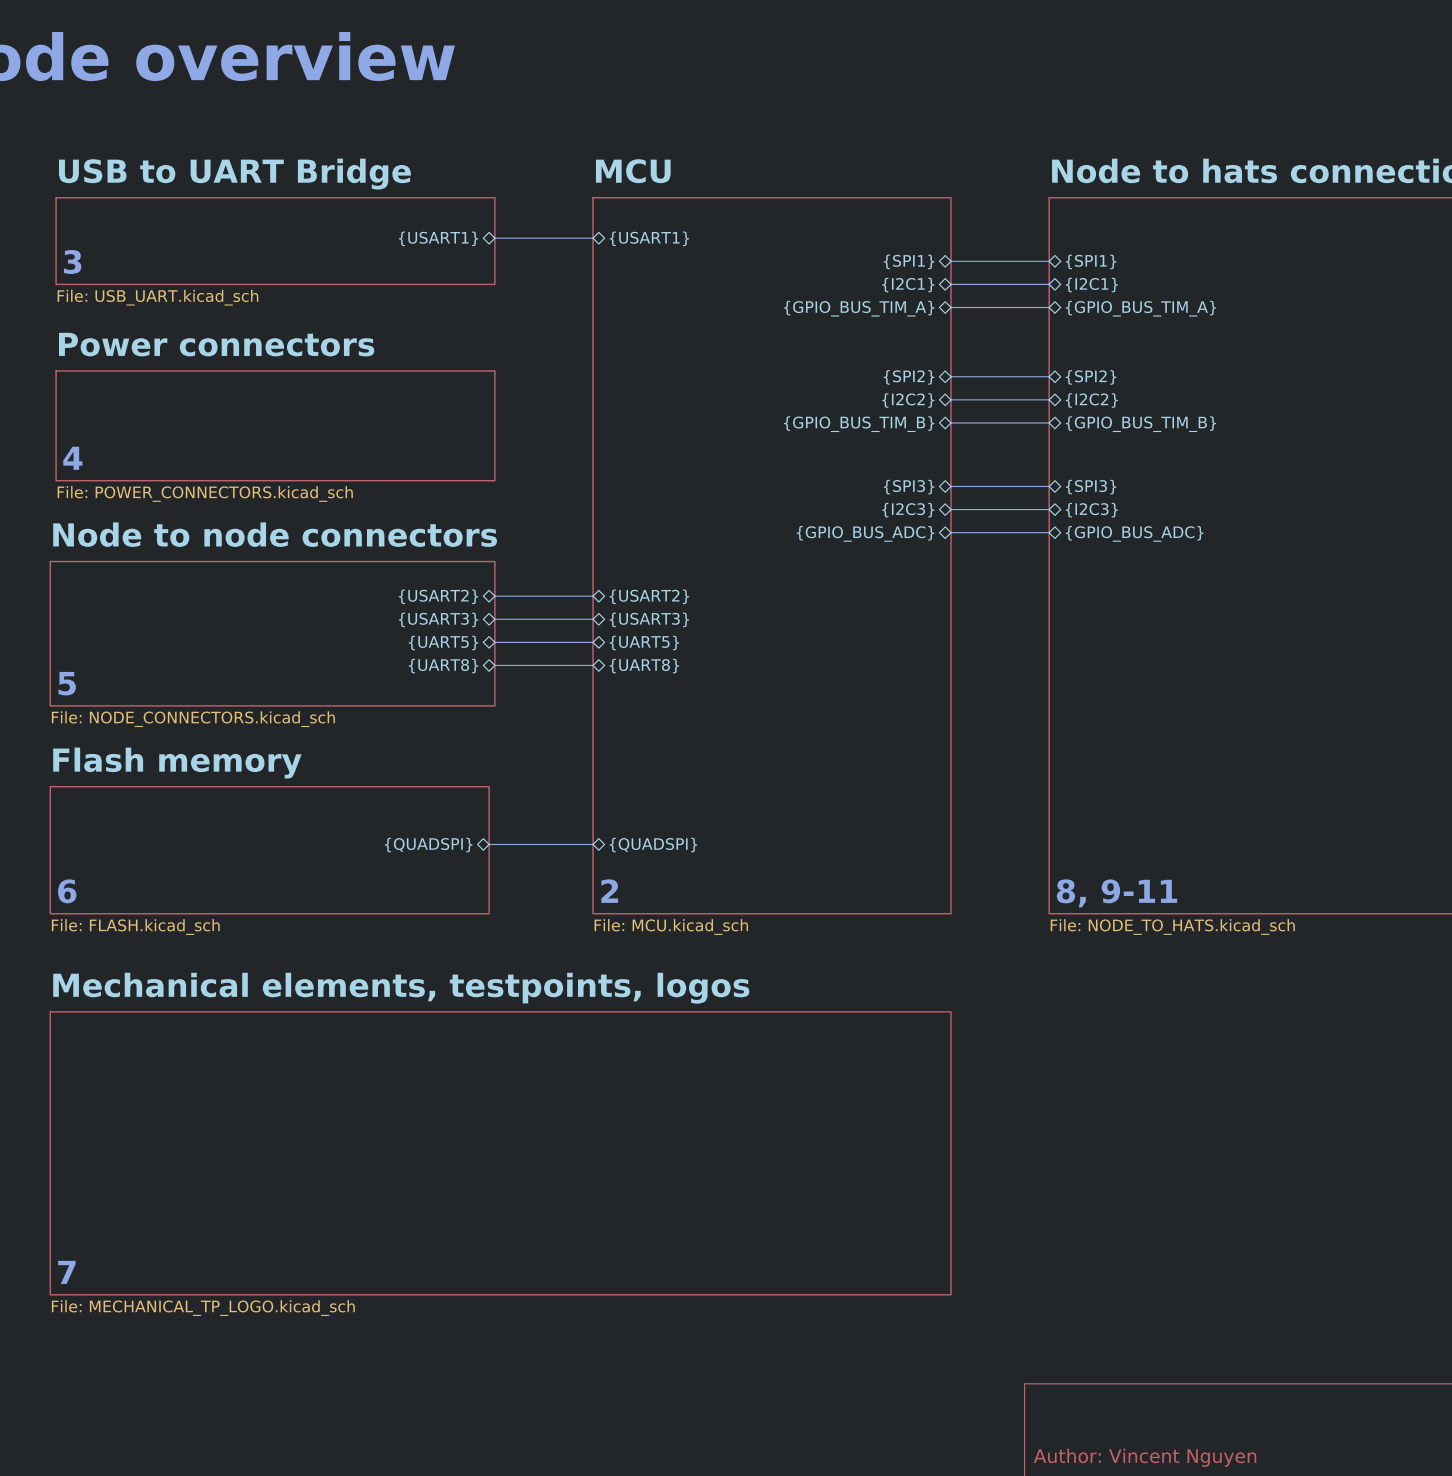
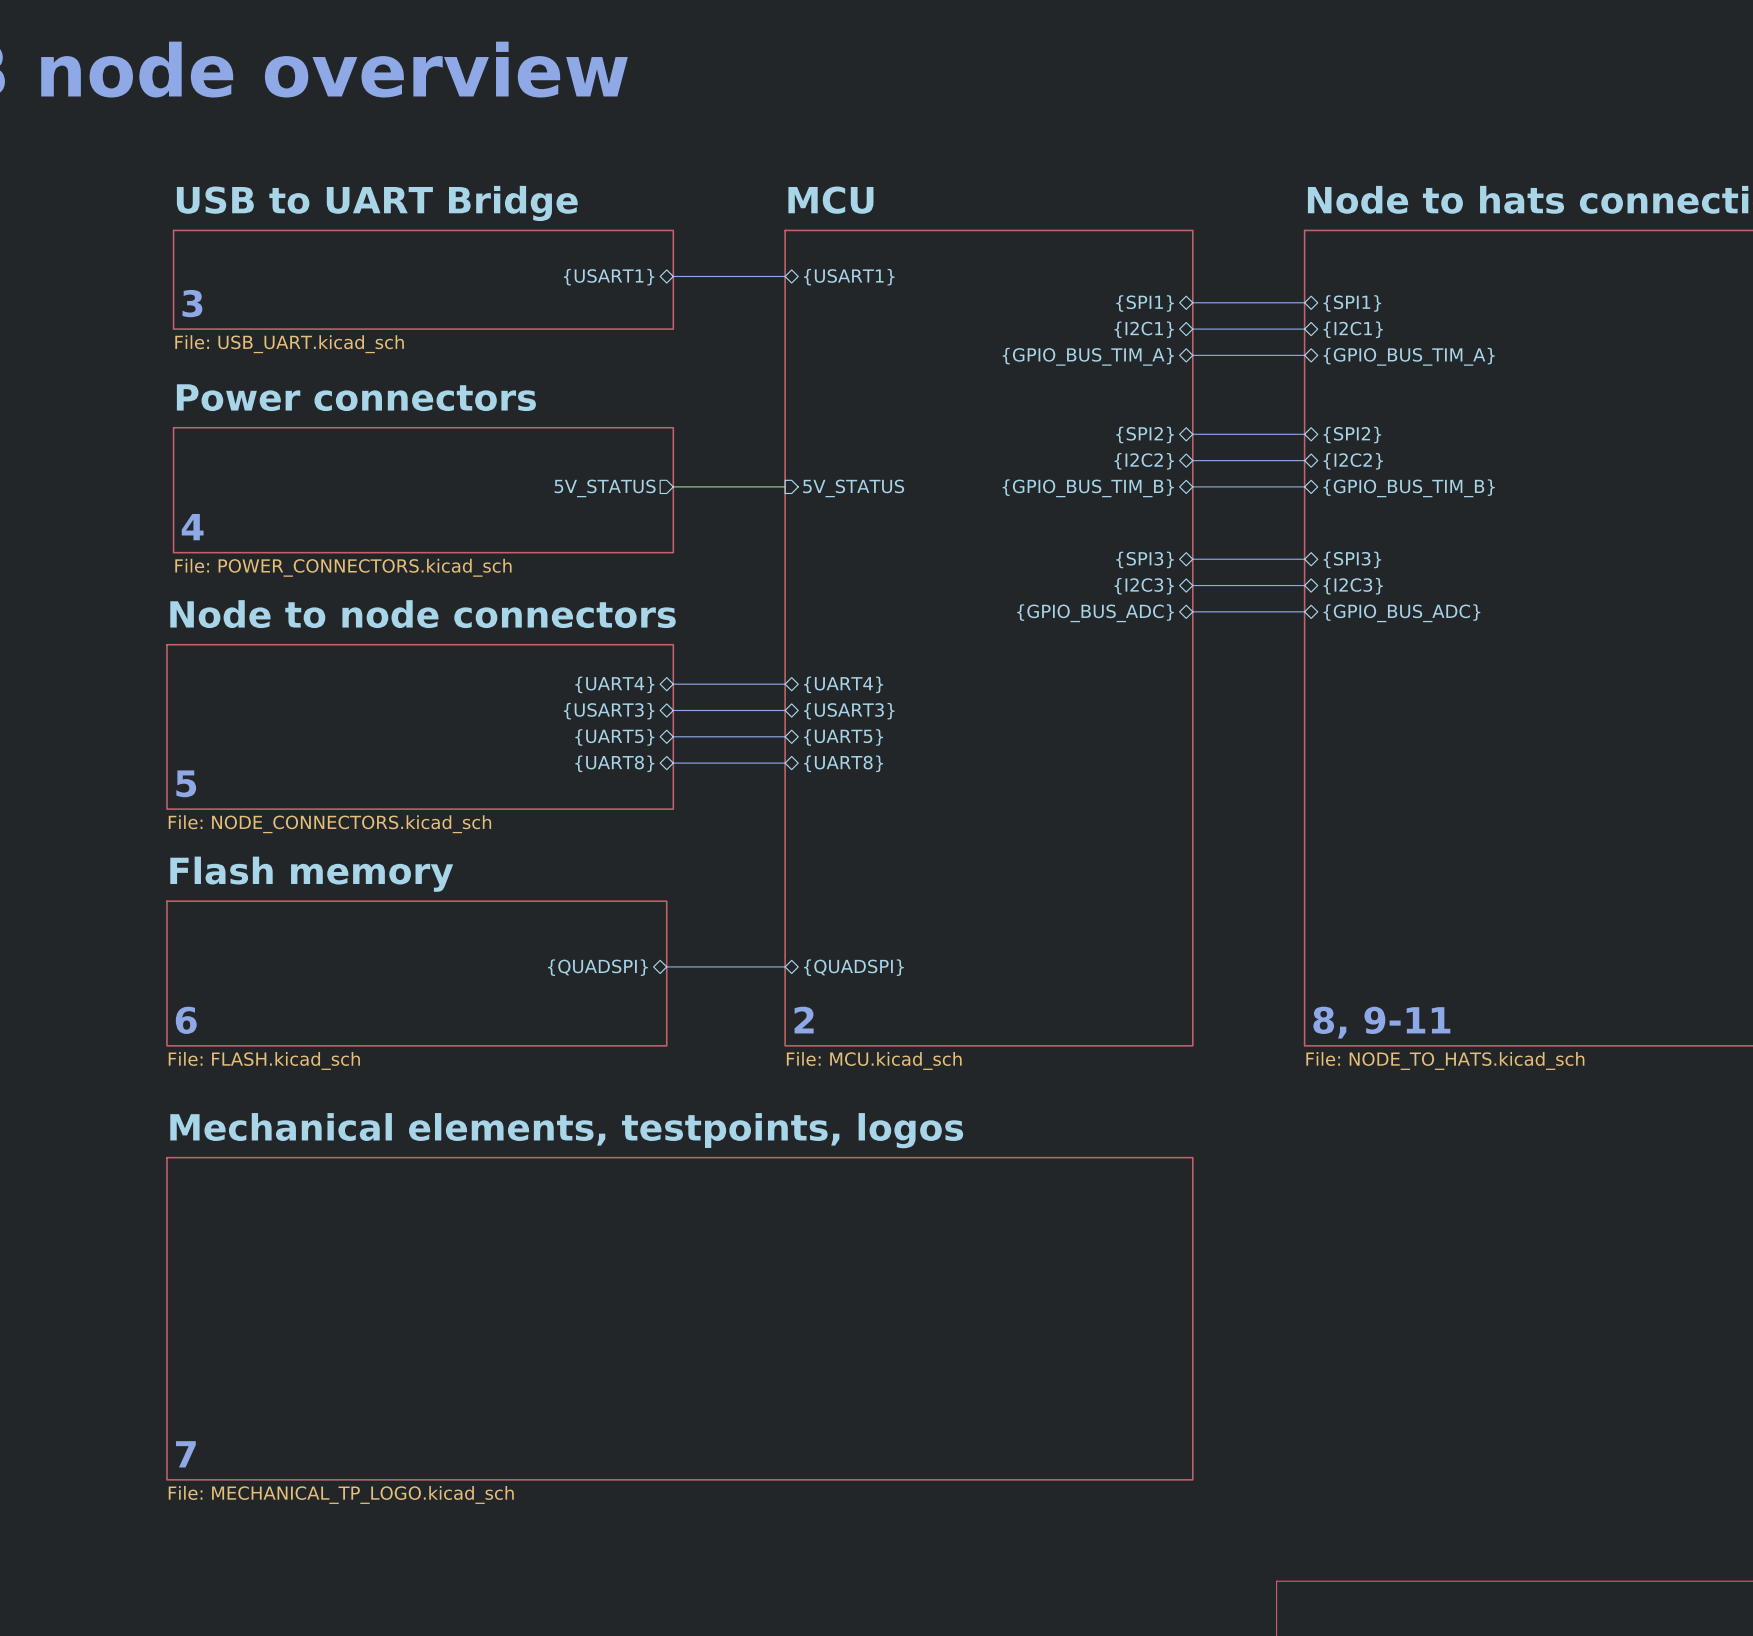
wire: none -> (673, 486) (785, 486)
sheet pin: none -> 5V_STATUS (605, 488)
sheet pin: none -> 5V_STATUS (853, 488)
sheet pin: {USART2} (438, 596) -> {UART4} (614, 684)
sheet pin: {USART2} (649, 596) -> {UART4} (843, 684)

